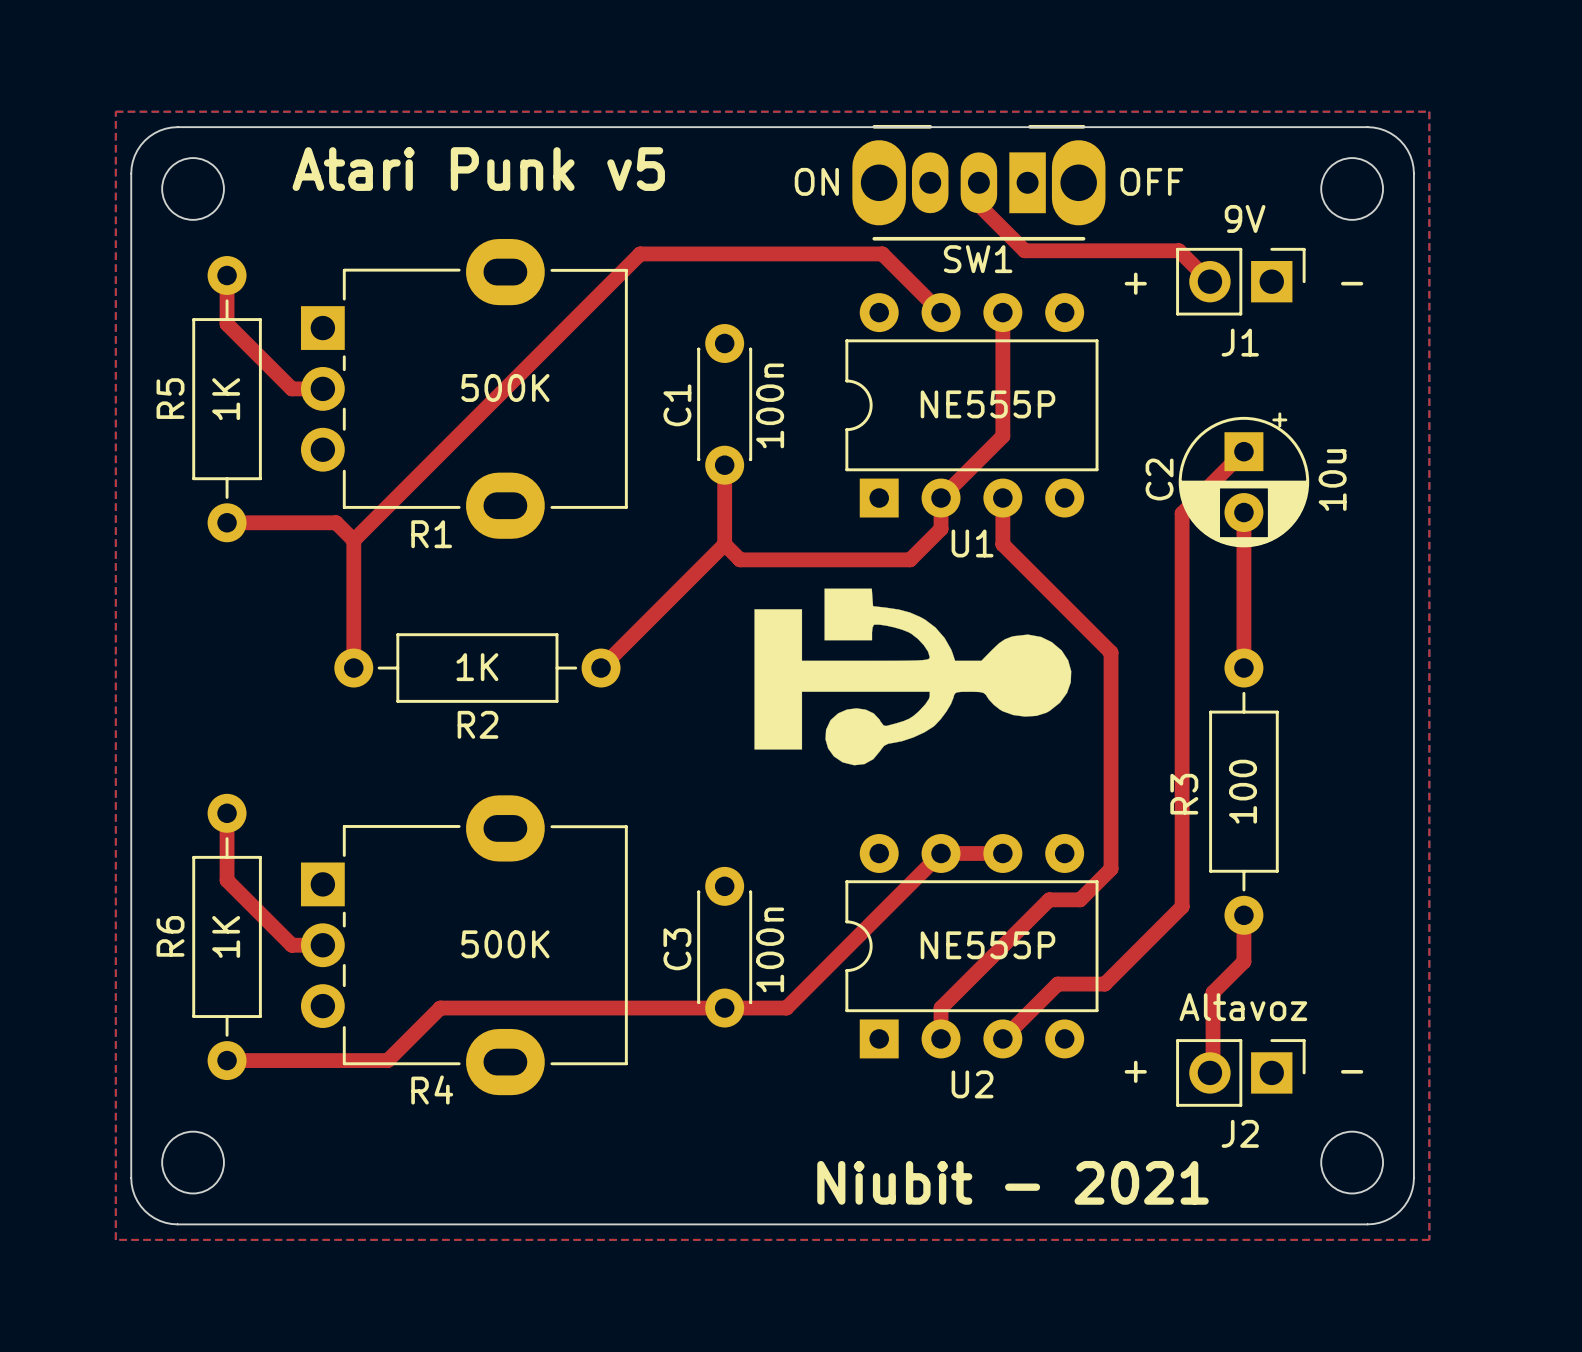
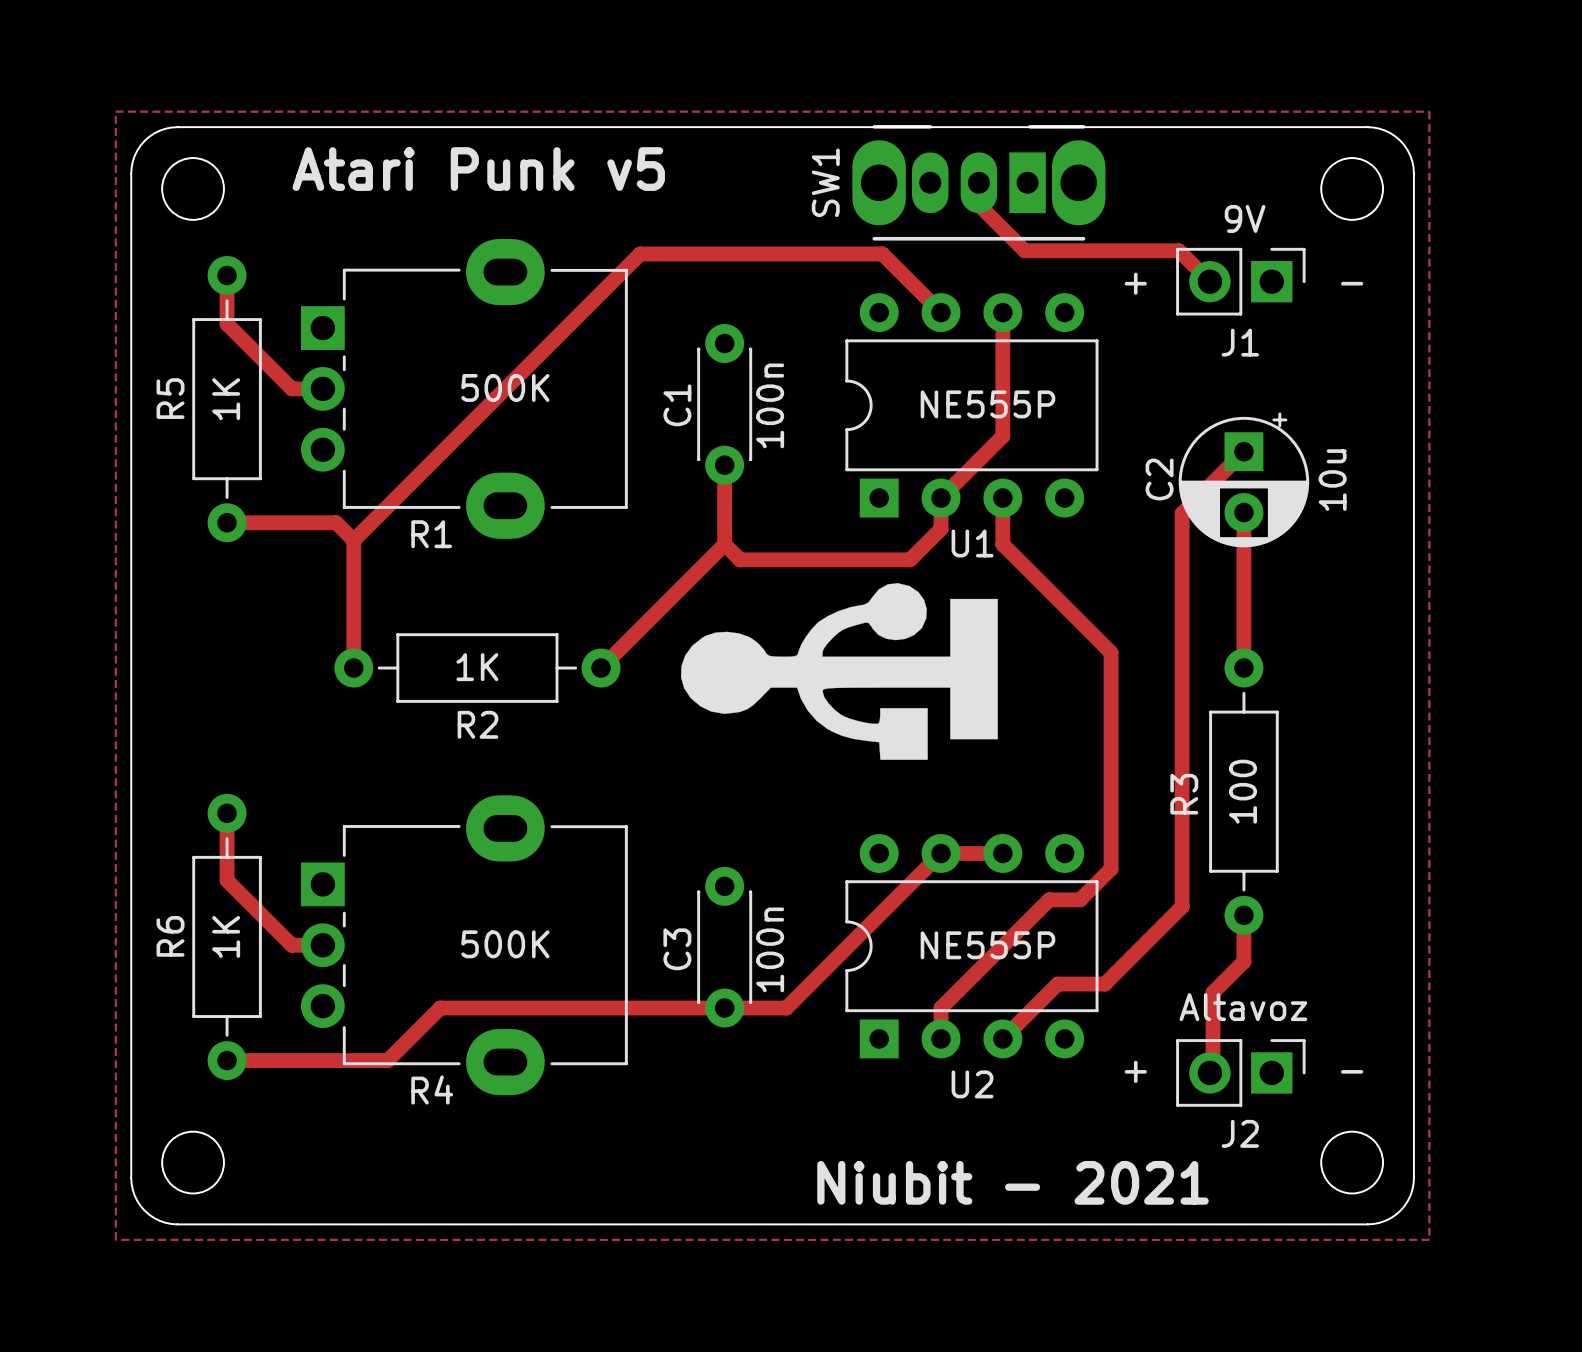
text: ON (816, 181) -> none
text: OFF (1151, 181) -> none
SW1 name rotation: 0° (978, 259) -> 90° counterclockwise (825, 182)
SW1 name position: SW1 (978, 259) -> SW1 (825, 182)
drawing: none -> [680, 583, 998, 760]
drawing: [754, 588, 1072, 766] -> none

